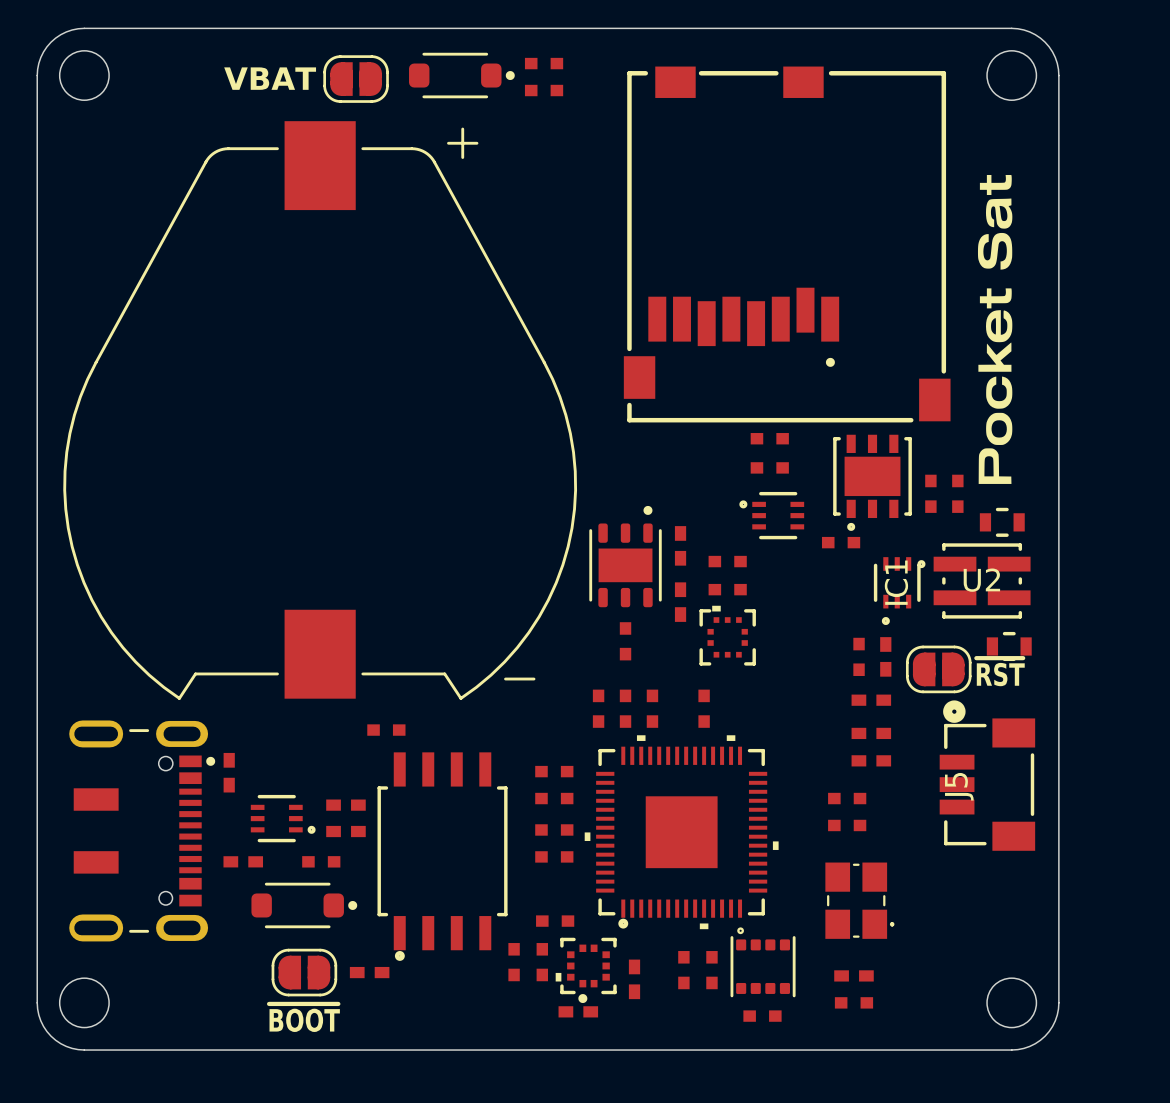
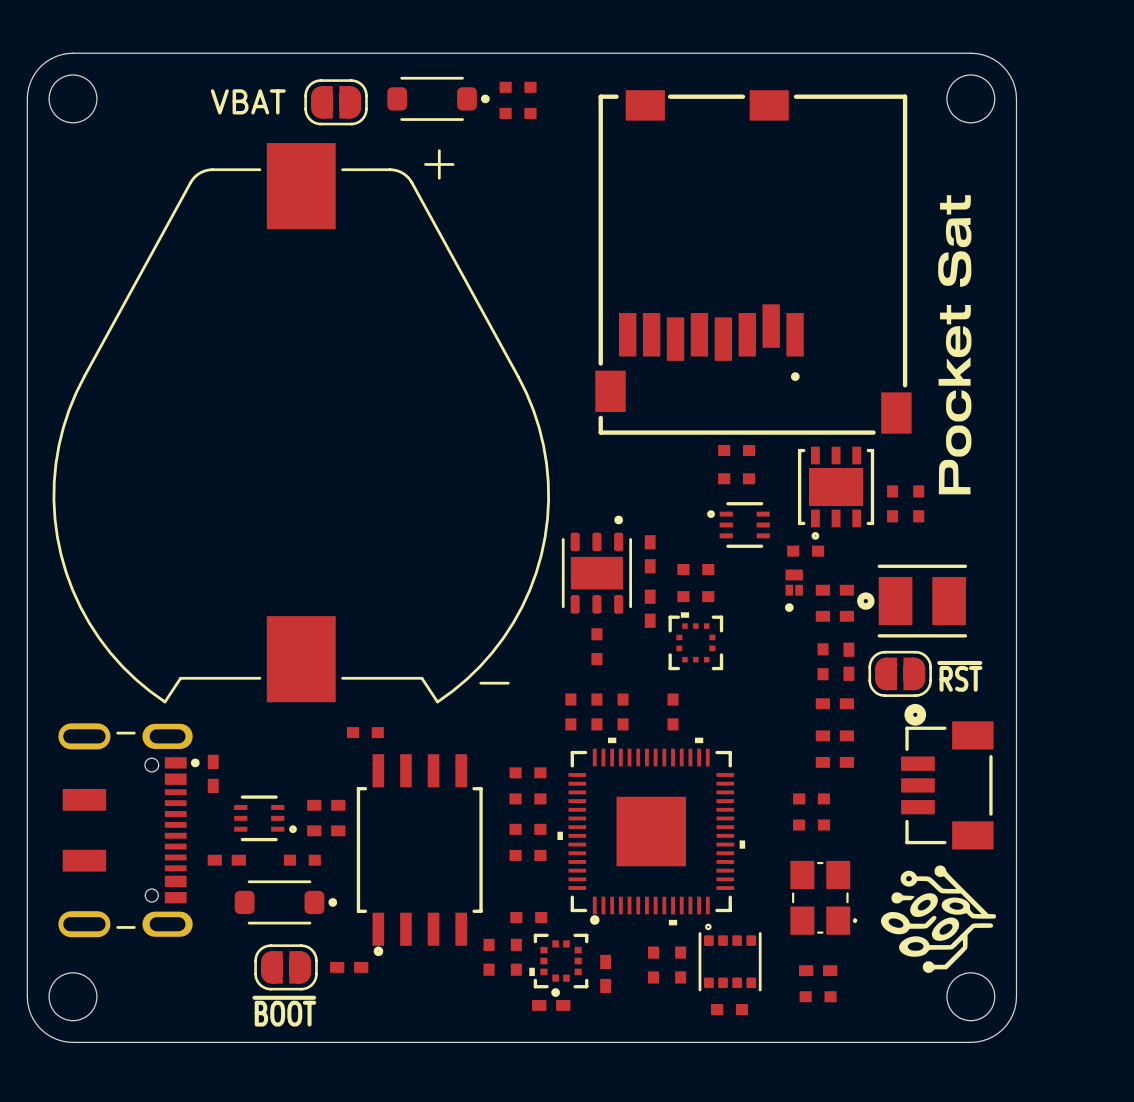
part: (1002, 522) -> none
U2: (974, 580) -> none
part: none -> (834, 590)
part: none -> (793, 590)
IC1: (897, 591) -> none
part: none -> (912, 601)
part: none -> (834, 616)
part: (1009, 646) -> none
J5 name: J5 (959, 786) -> none
drawing: none -> [880, 865, 997, 973]

